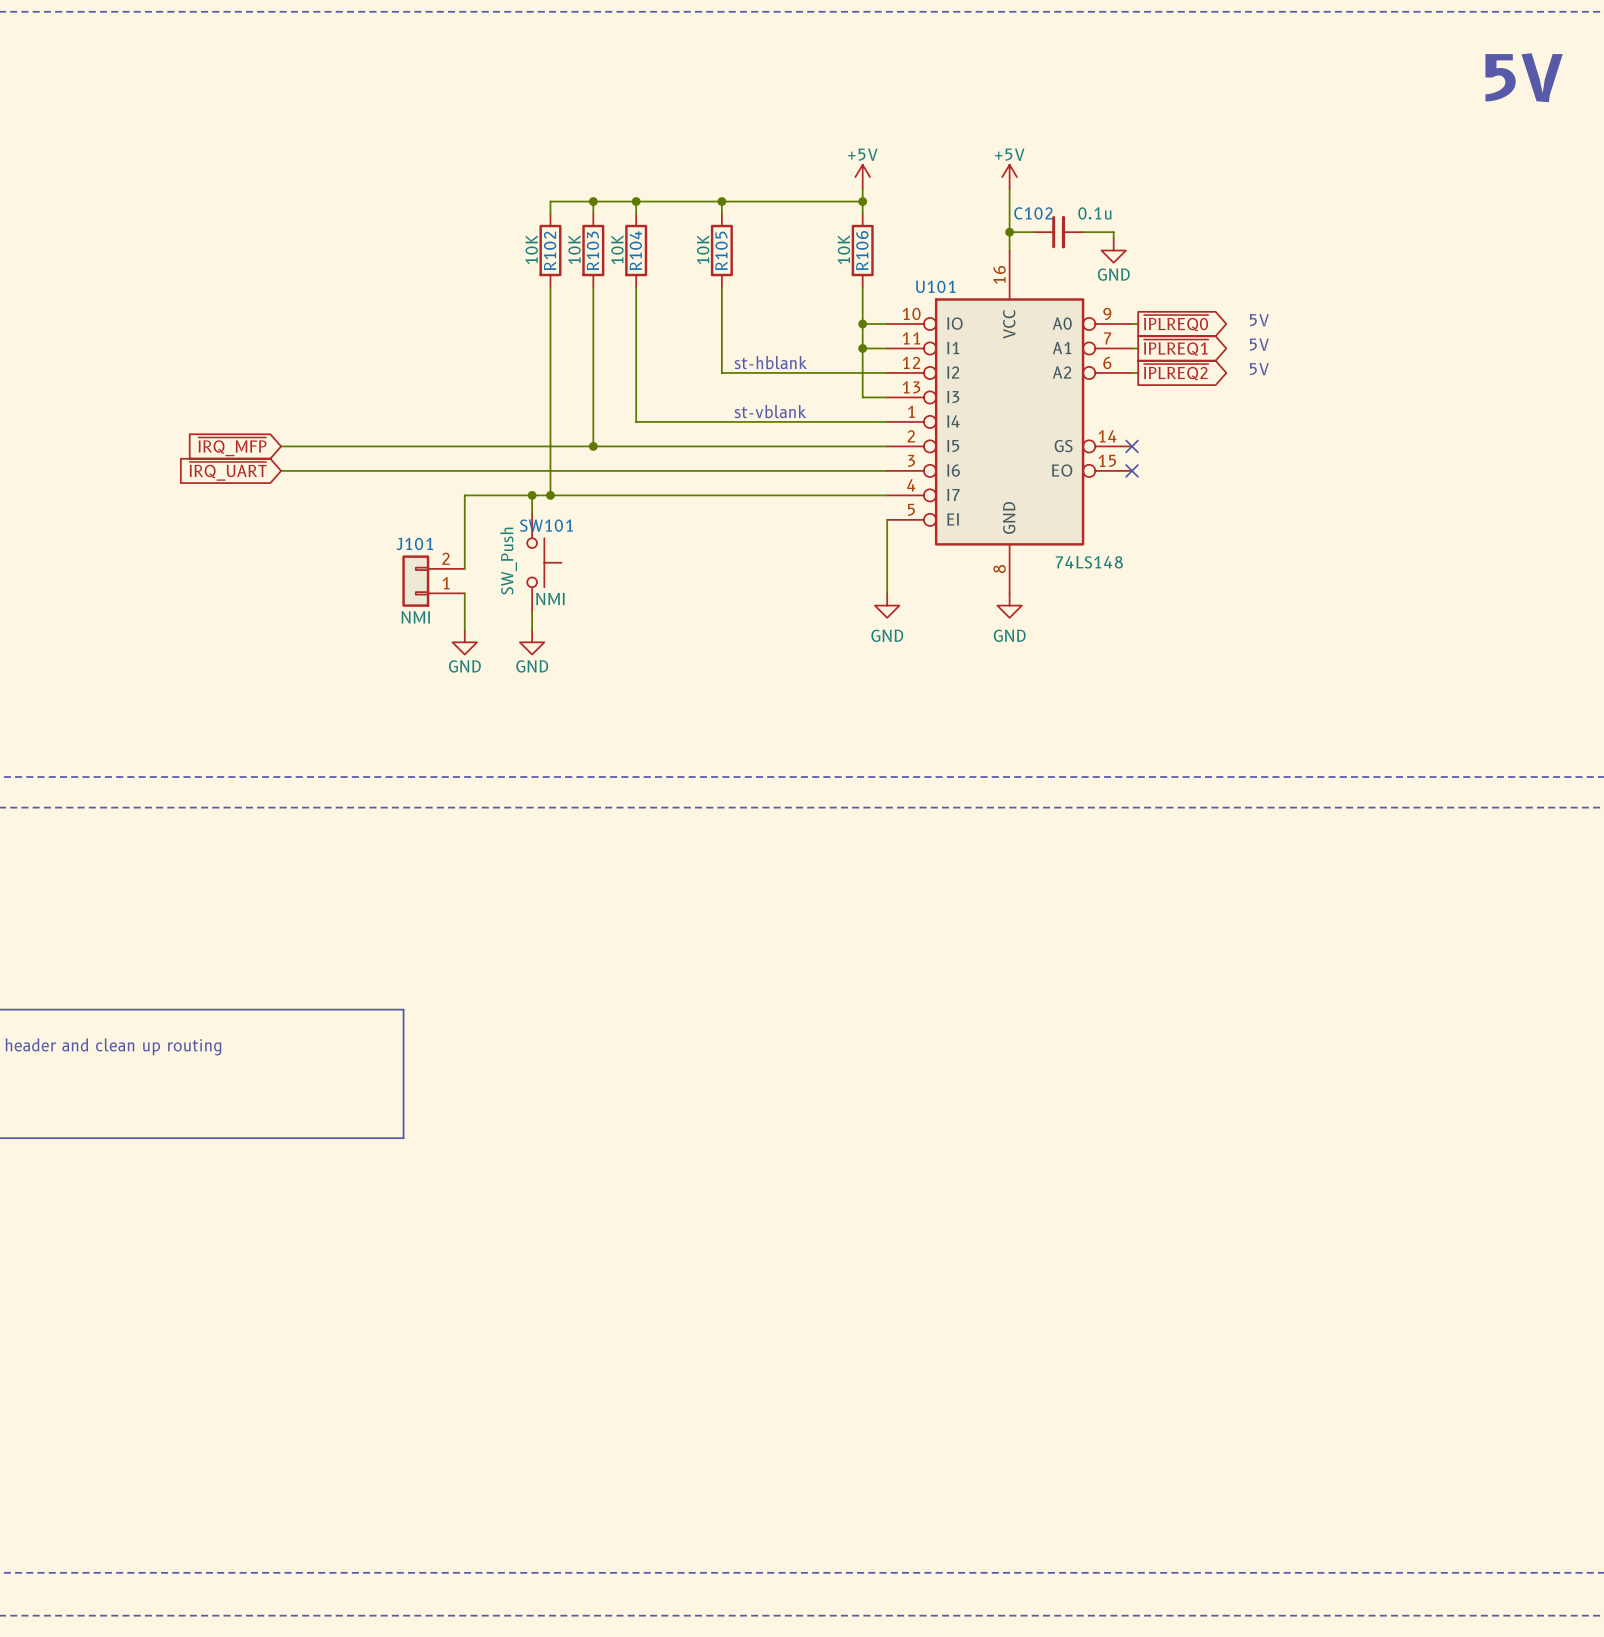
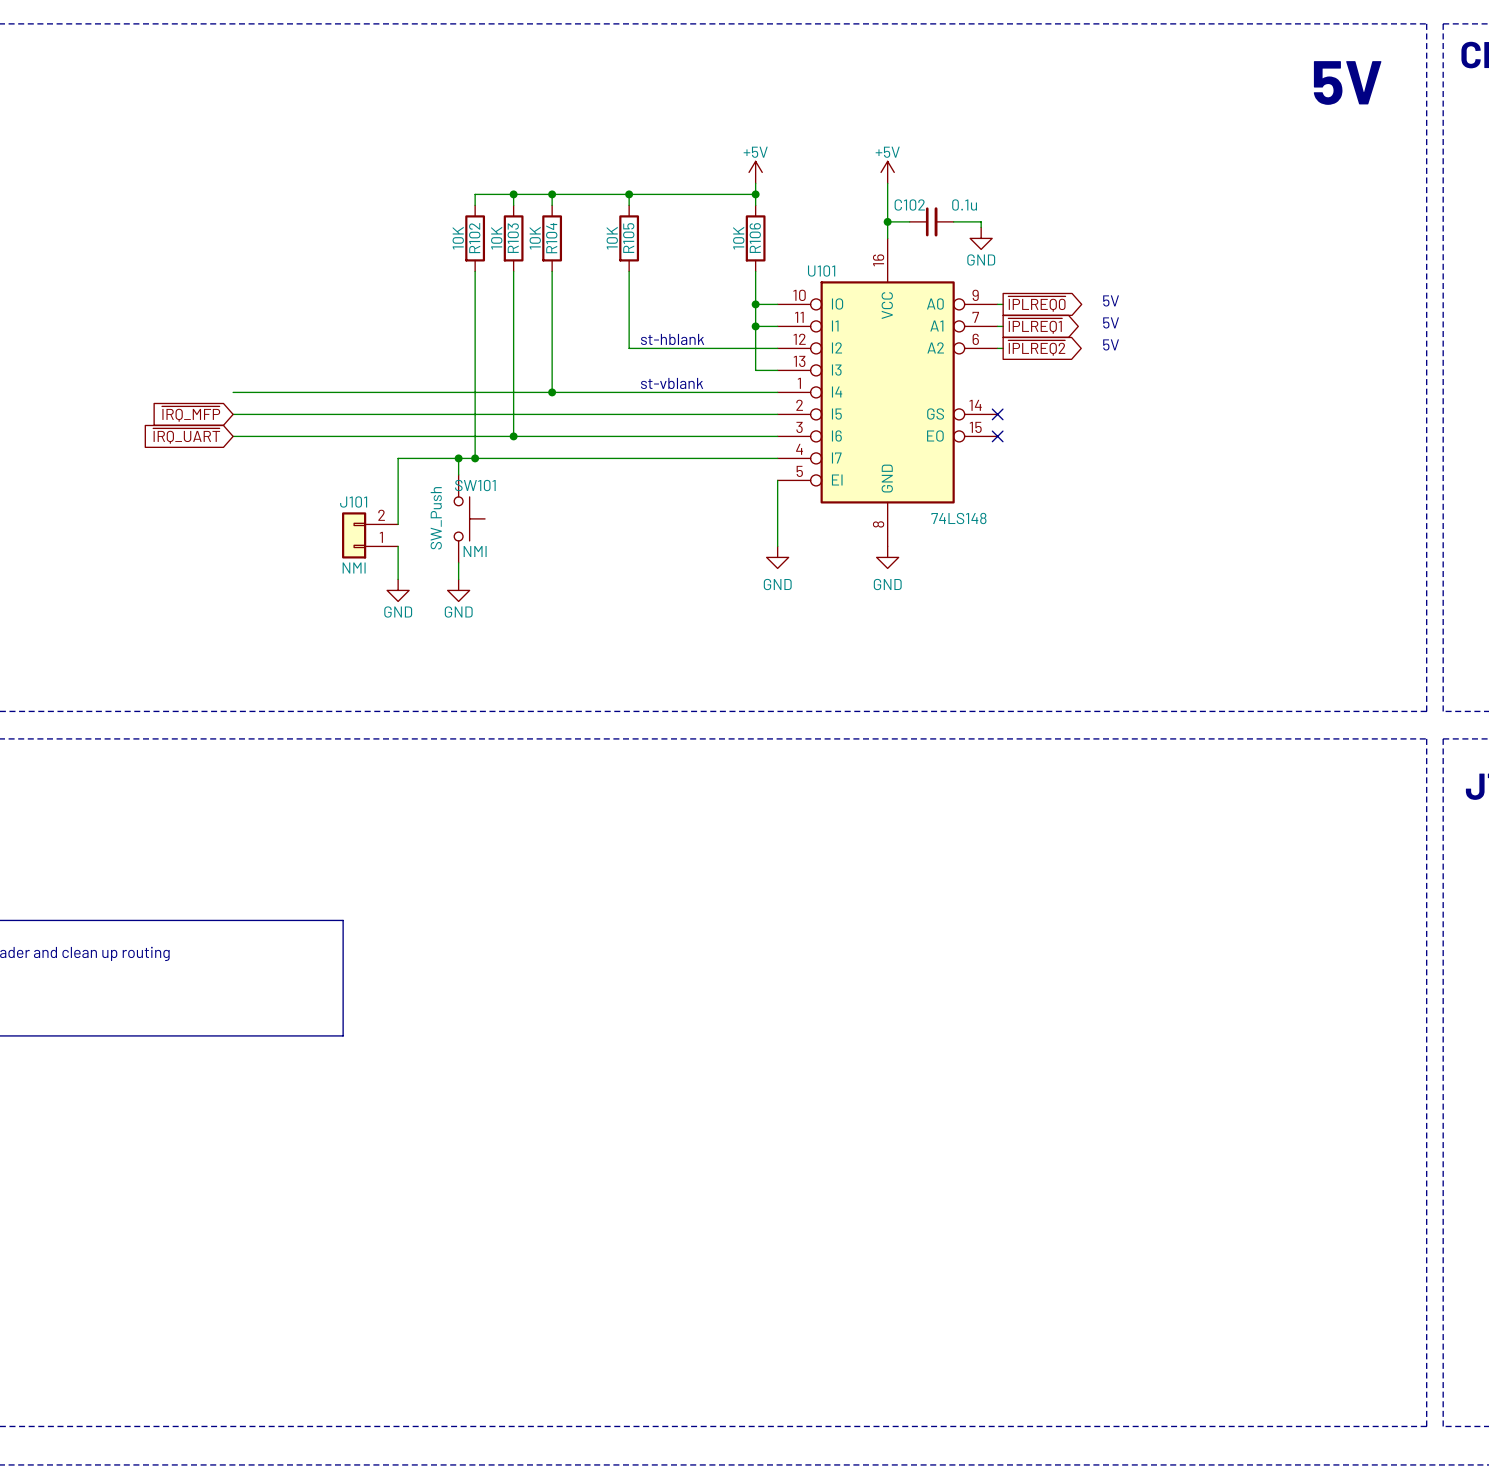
wire: none -> (233, 392) (552, 392)
junction: none -> (552, 392)
wire: none -> (513, 414) (513, 436)
junction position: (593, 446) -> (513, 436)

